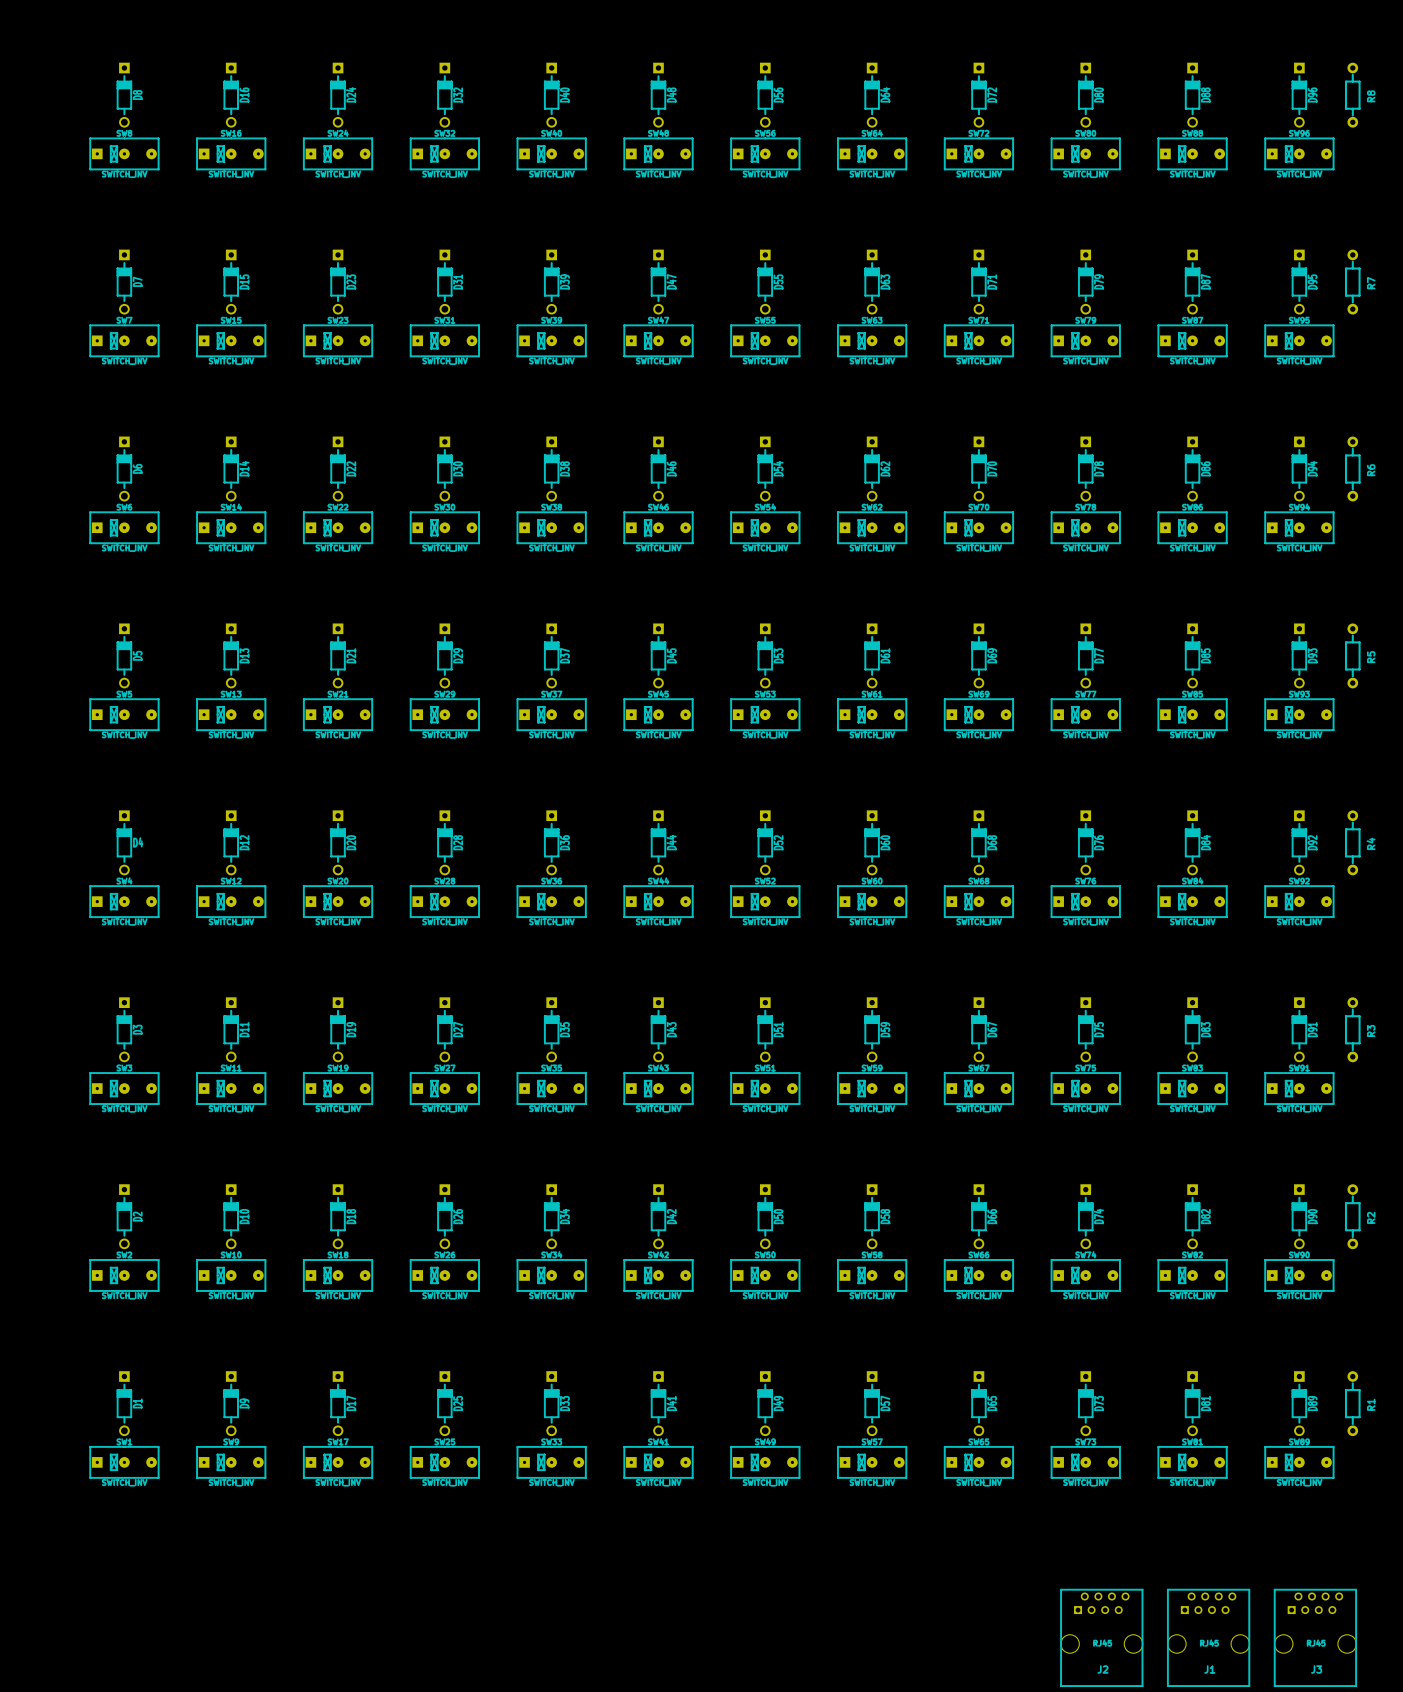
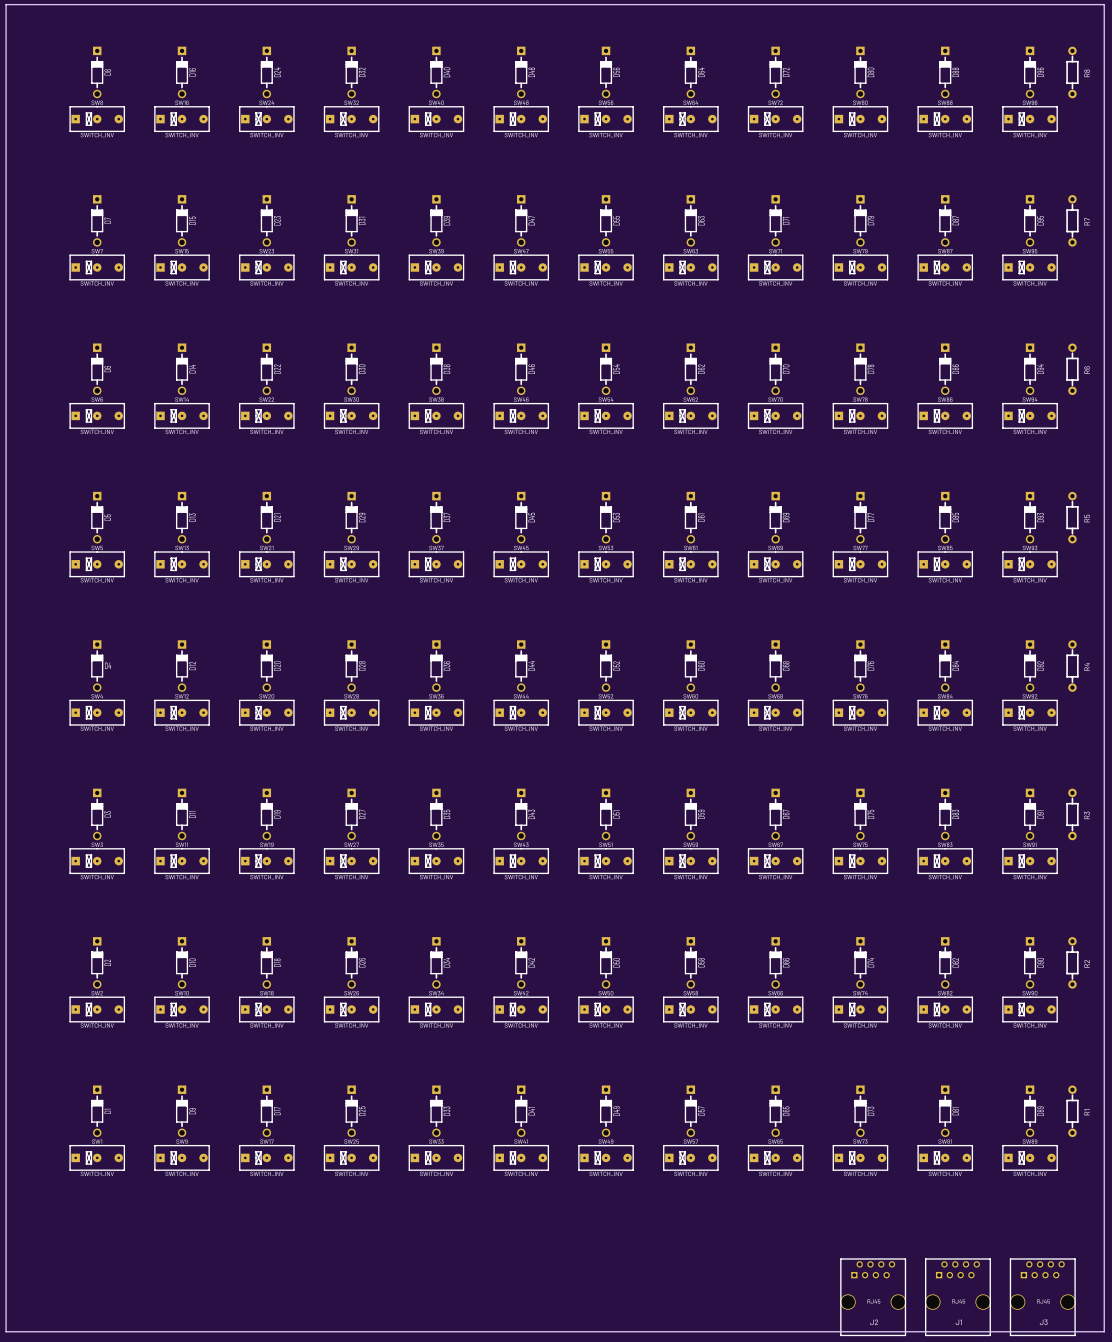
board edge: none -> (6, 4) (6, 1331) (1104, 1331) (1104, 4) (6, 4)

